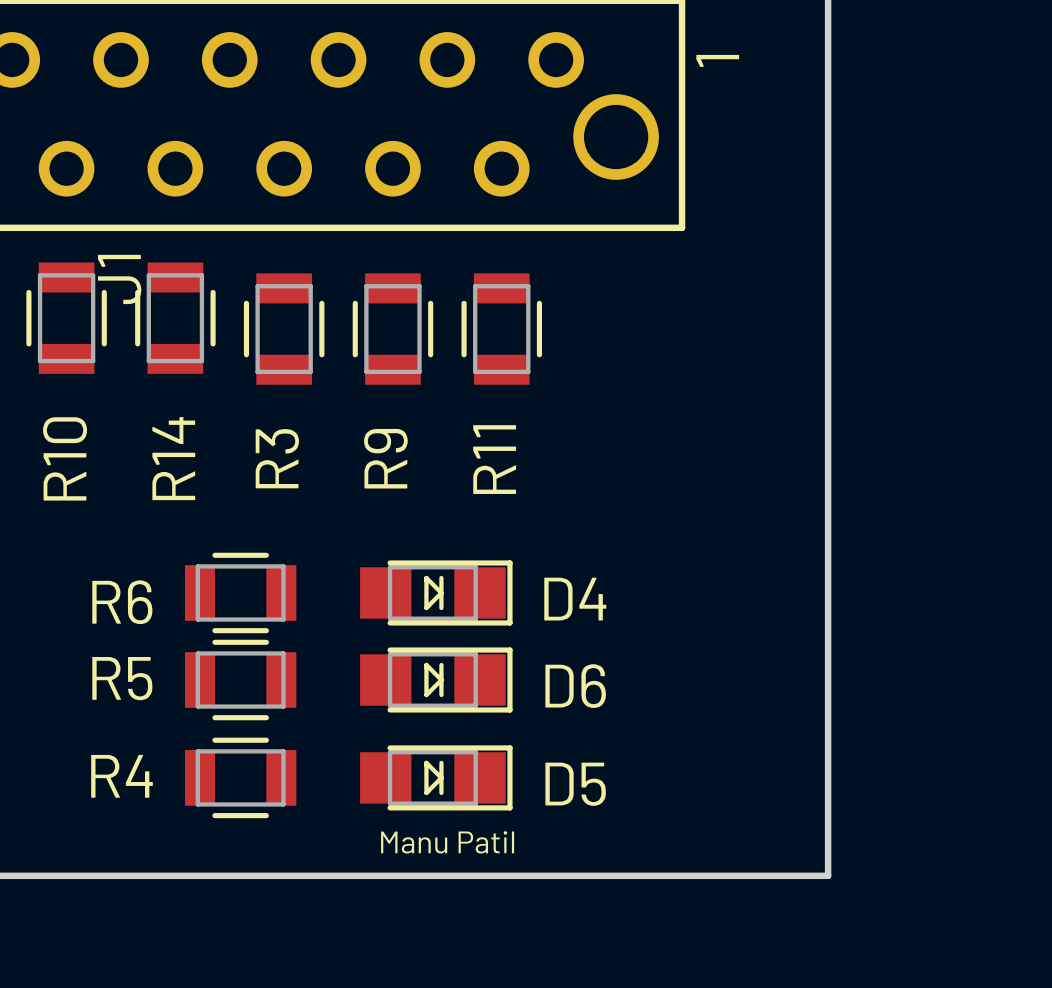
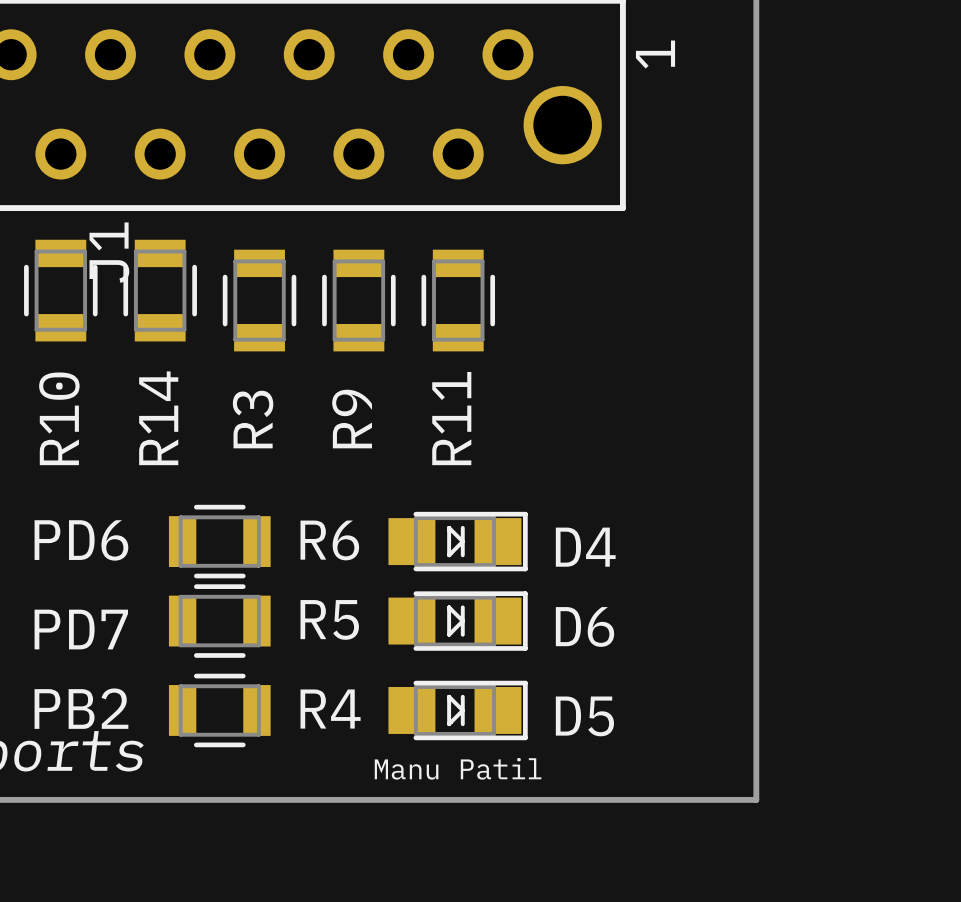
text: none -> PD6 (81, 540)
D4 position: (436, 592) -> (458, 541)
R6 name position: R6 (122, 602) -> R6 (329, 540)
R5 name position: R5 (122, 678) -> R5 (329, 619)
D6 position: (436, 680) -> (458, 621)
text: none -> PD7 (81, 629)
text: none -> PB2 (81, 708)
R4 name position: R4 (122, 776) -> R4 (330, 709)
D5 position: (436, 777) -> (458, 710)
text position: Manu Patil (447, 842) -> Manu Patil (458, 768)

